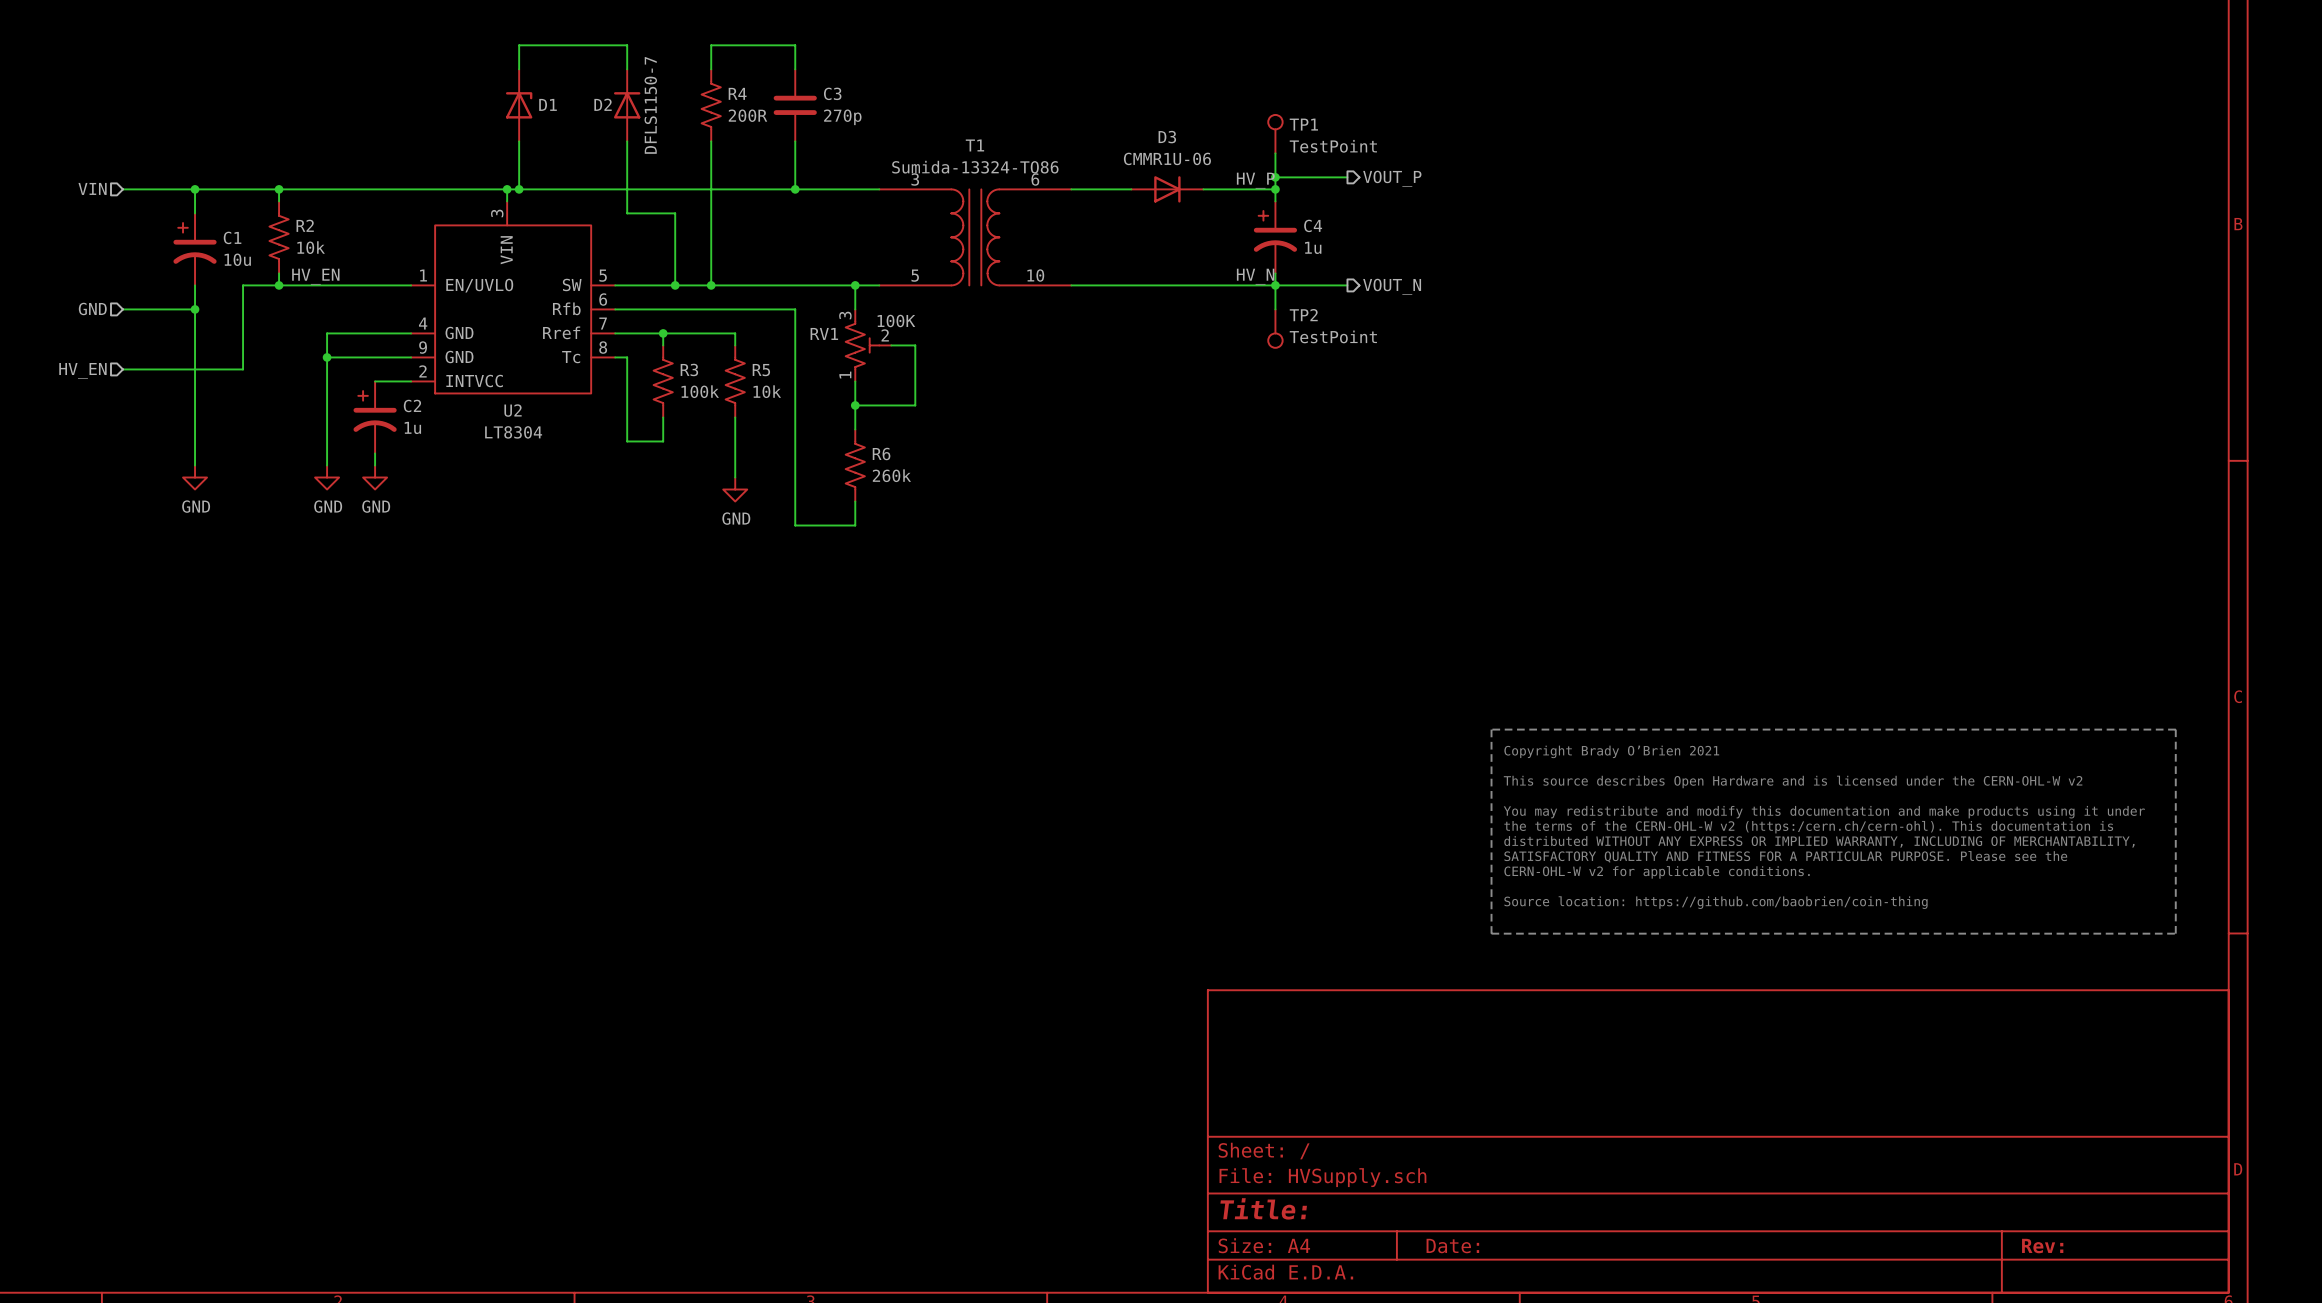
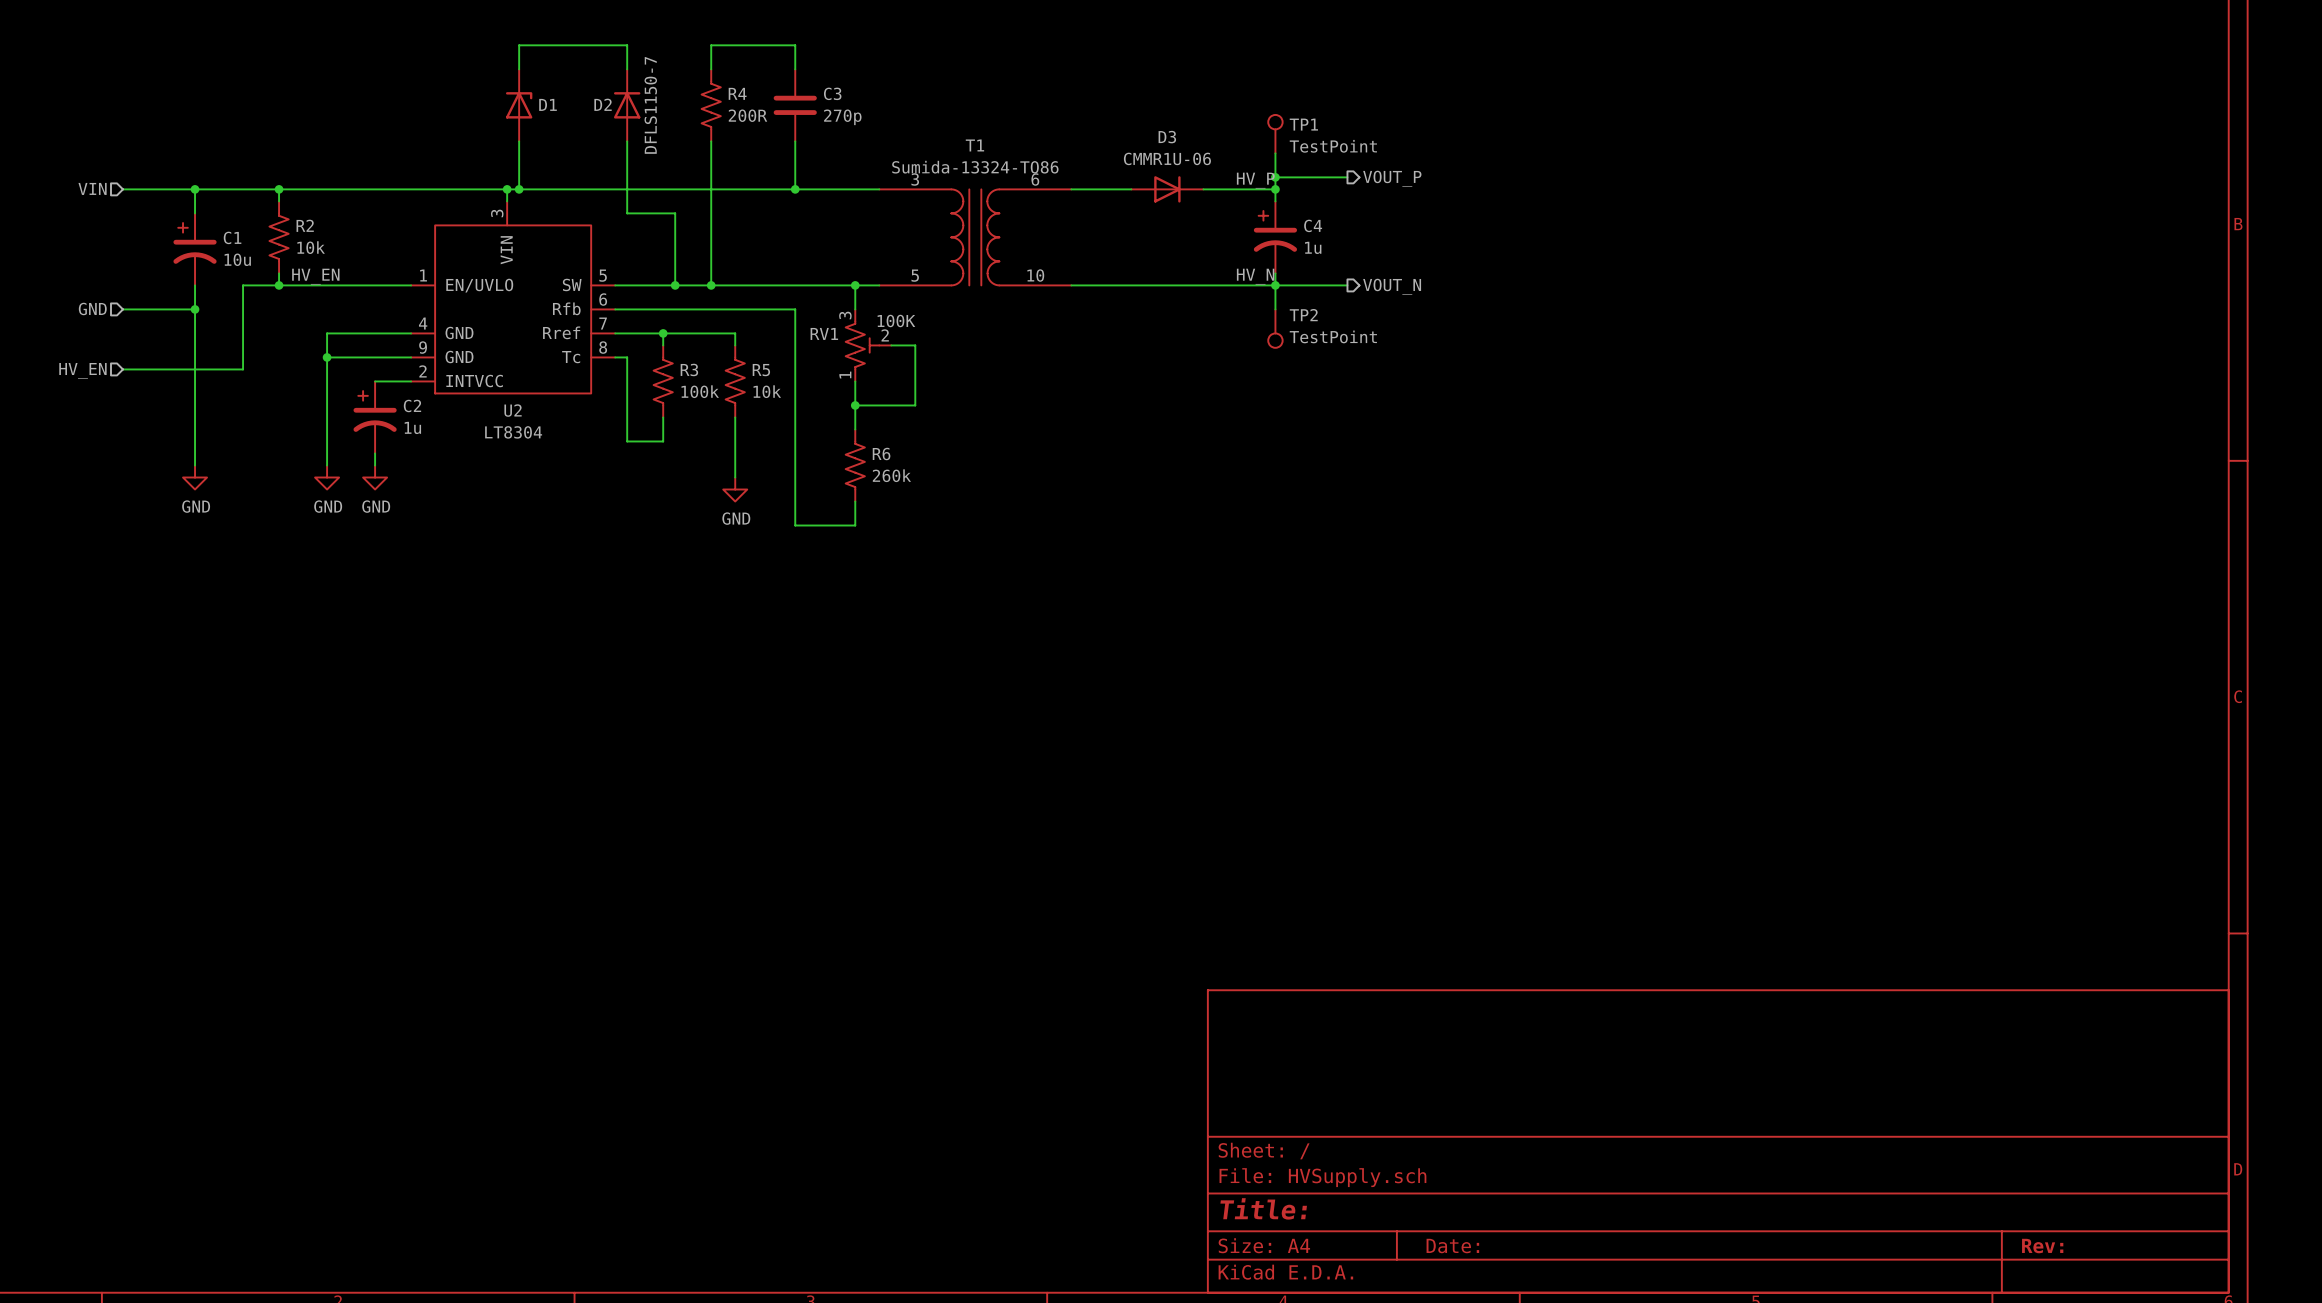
line: (1491, 729) (1491, 933) (2175, 933) (2175, 729) (1491, 729) -> none
text: Copyright Brady O’Brien 2021 (1611, 751) -> none
text: This source describes Open Hardware and is licensed under the CERN-OHL-W v2 (1793, 781) -> none
text: You may redistribute and modify this documentation and make products using it under (1824, 812) -> none
text: the terms of the CERN-OHL-W v2 (https:/cern.ch/cern-ohl). This documentation is (1808, 827) -> none
text: distributed WITHOUT ANY EXPRESS OR IMPLIED WARRANTY, INCLUDING OF MERCHANTABILITY, (1819, 841) -> none
text: SATISFACTORY QUALITY AND FITNESS FOR A PARTICULAR PURPOSE. Please see the (1785, 856) -> none
text: CERN-OHL-W v2 for applicable conditions. (1657, 872) -> none
text: Source location: https://github.com/baobrien/coin-thing (1715, 902) -> none

